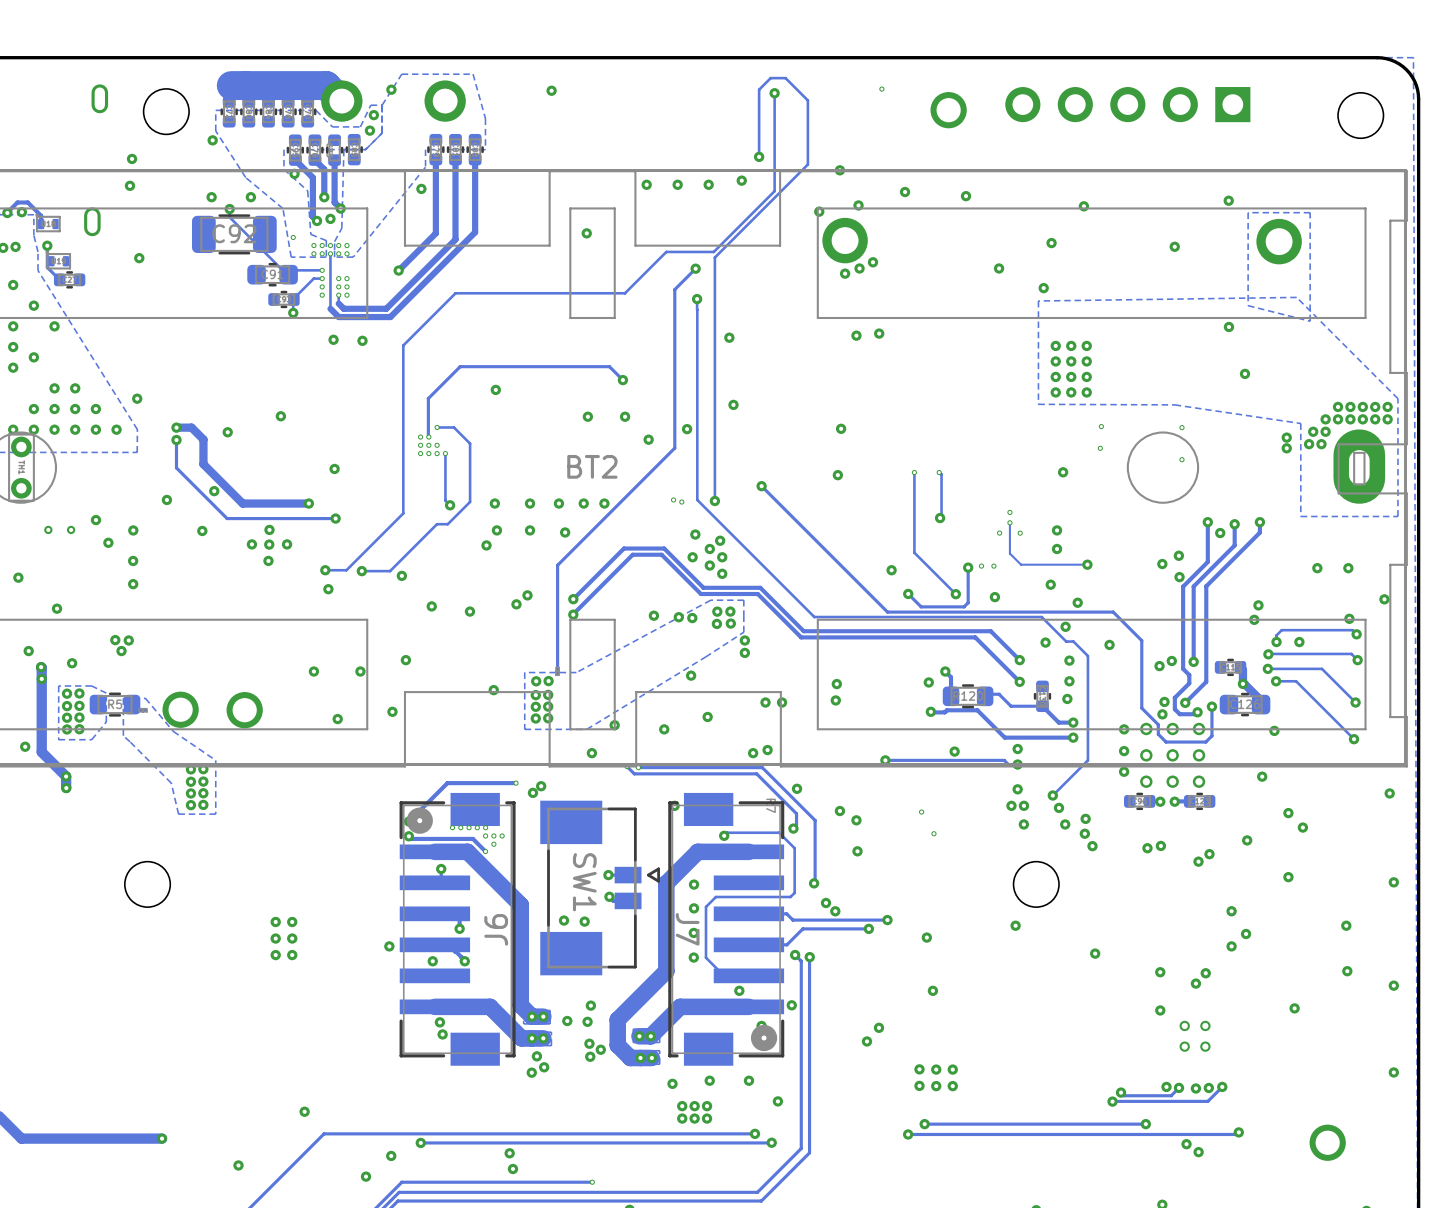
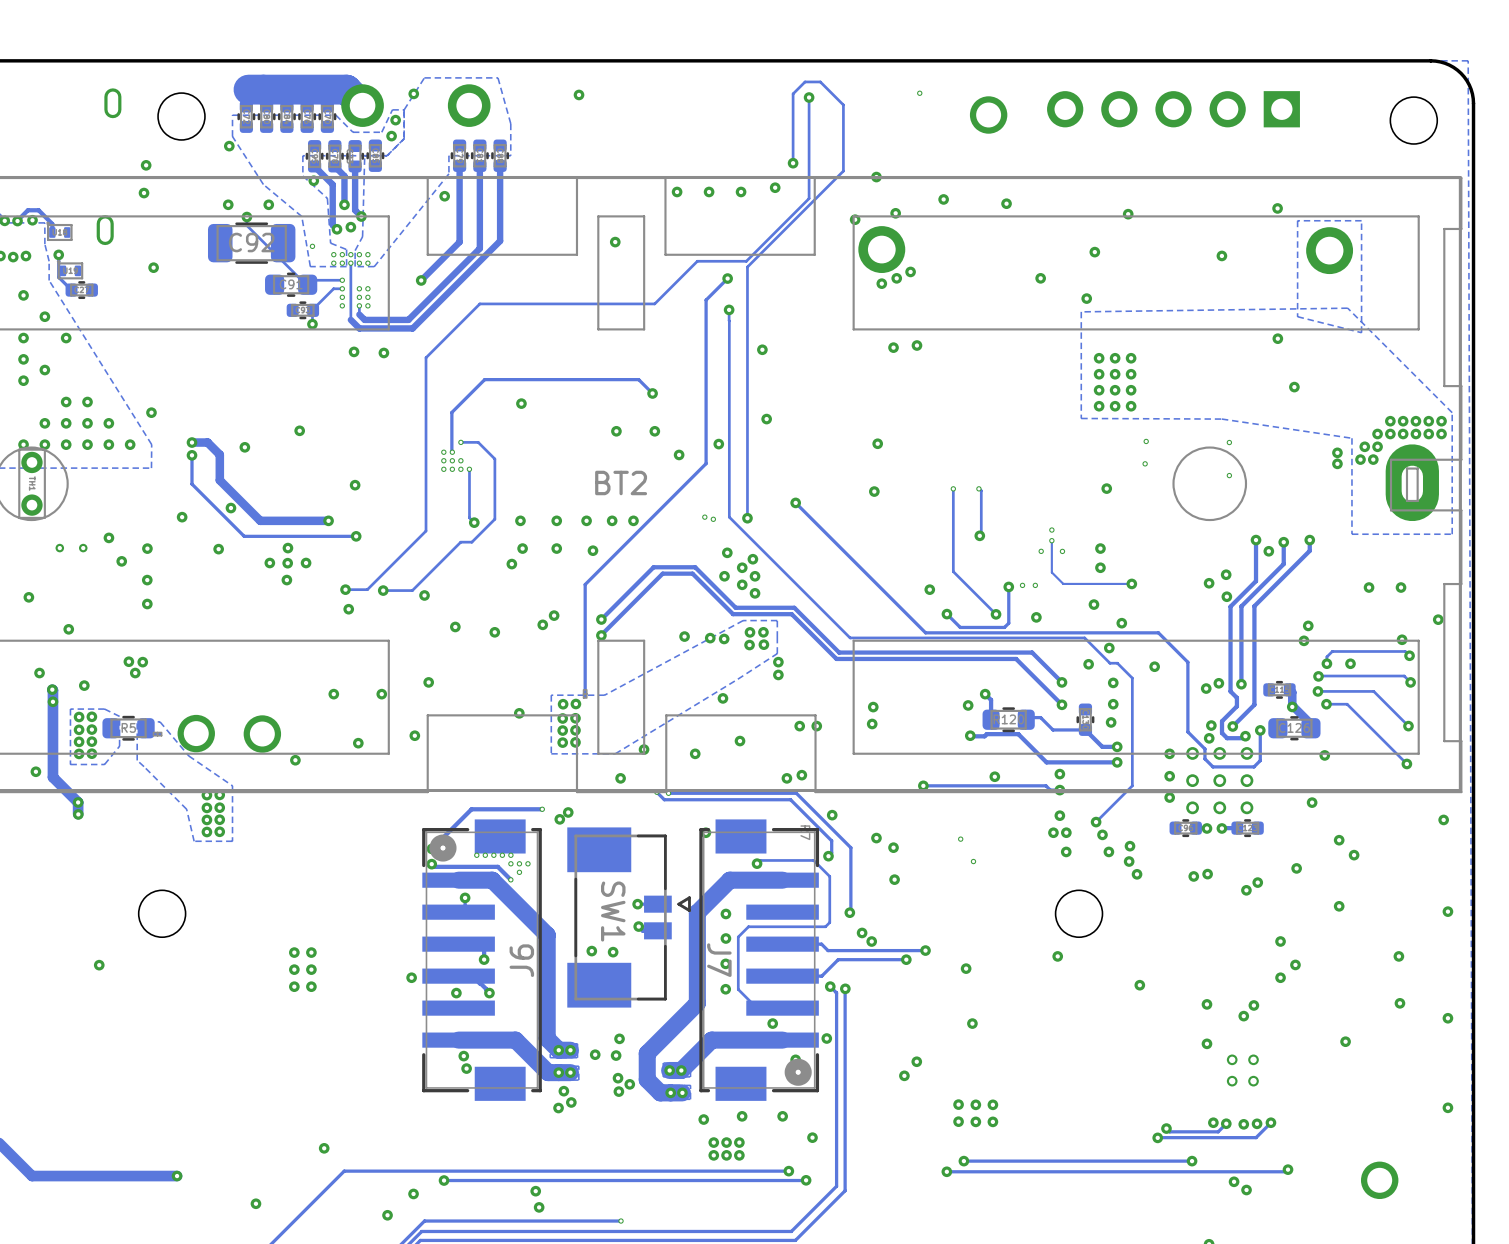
via: none -> (295, 760)
via: none -> (99, 965)

